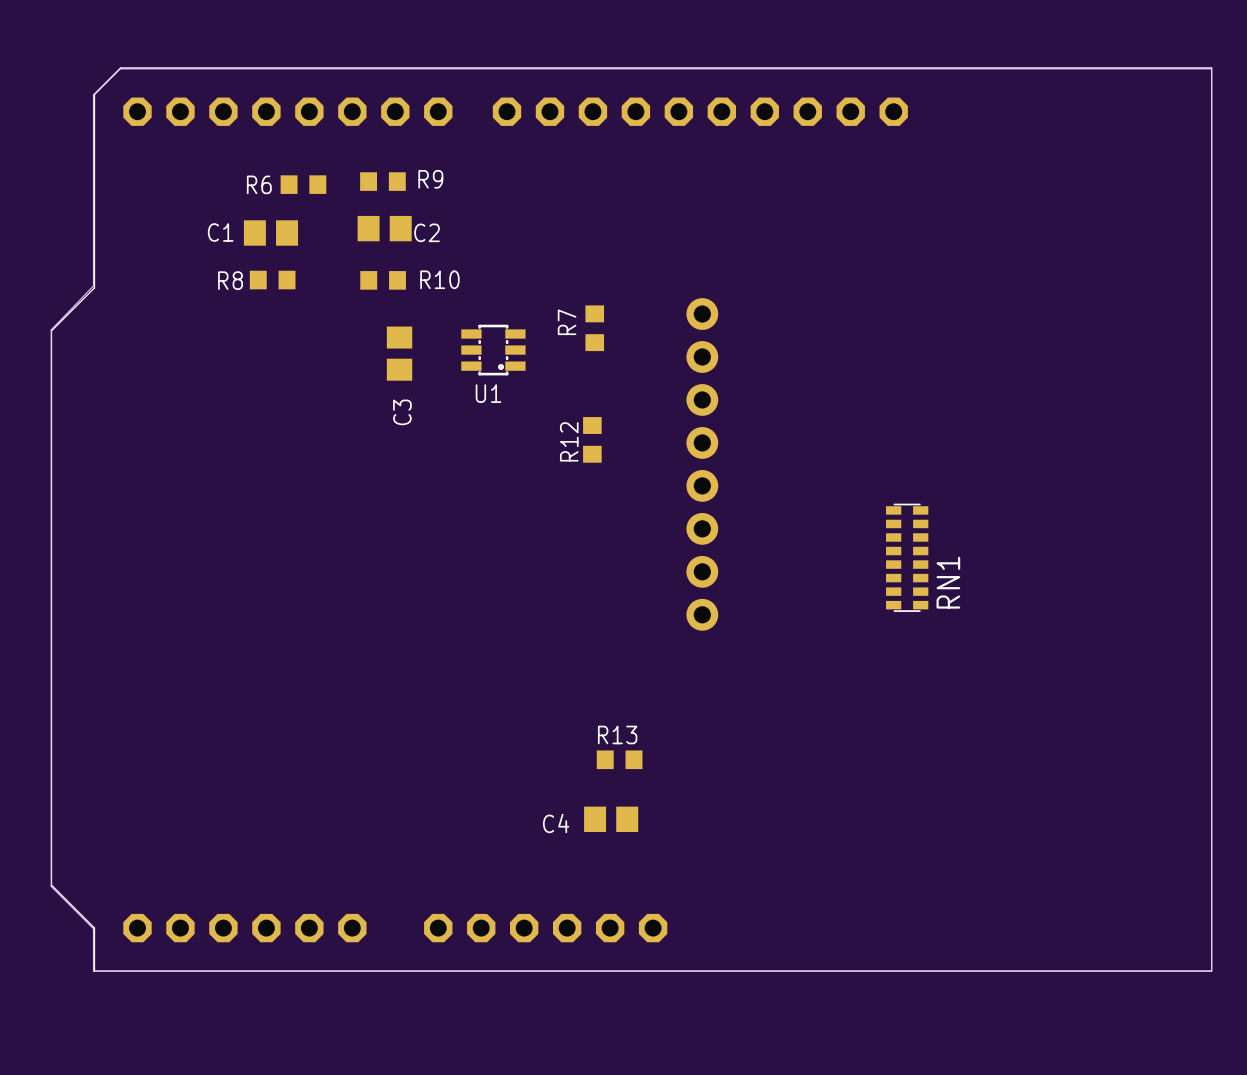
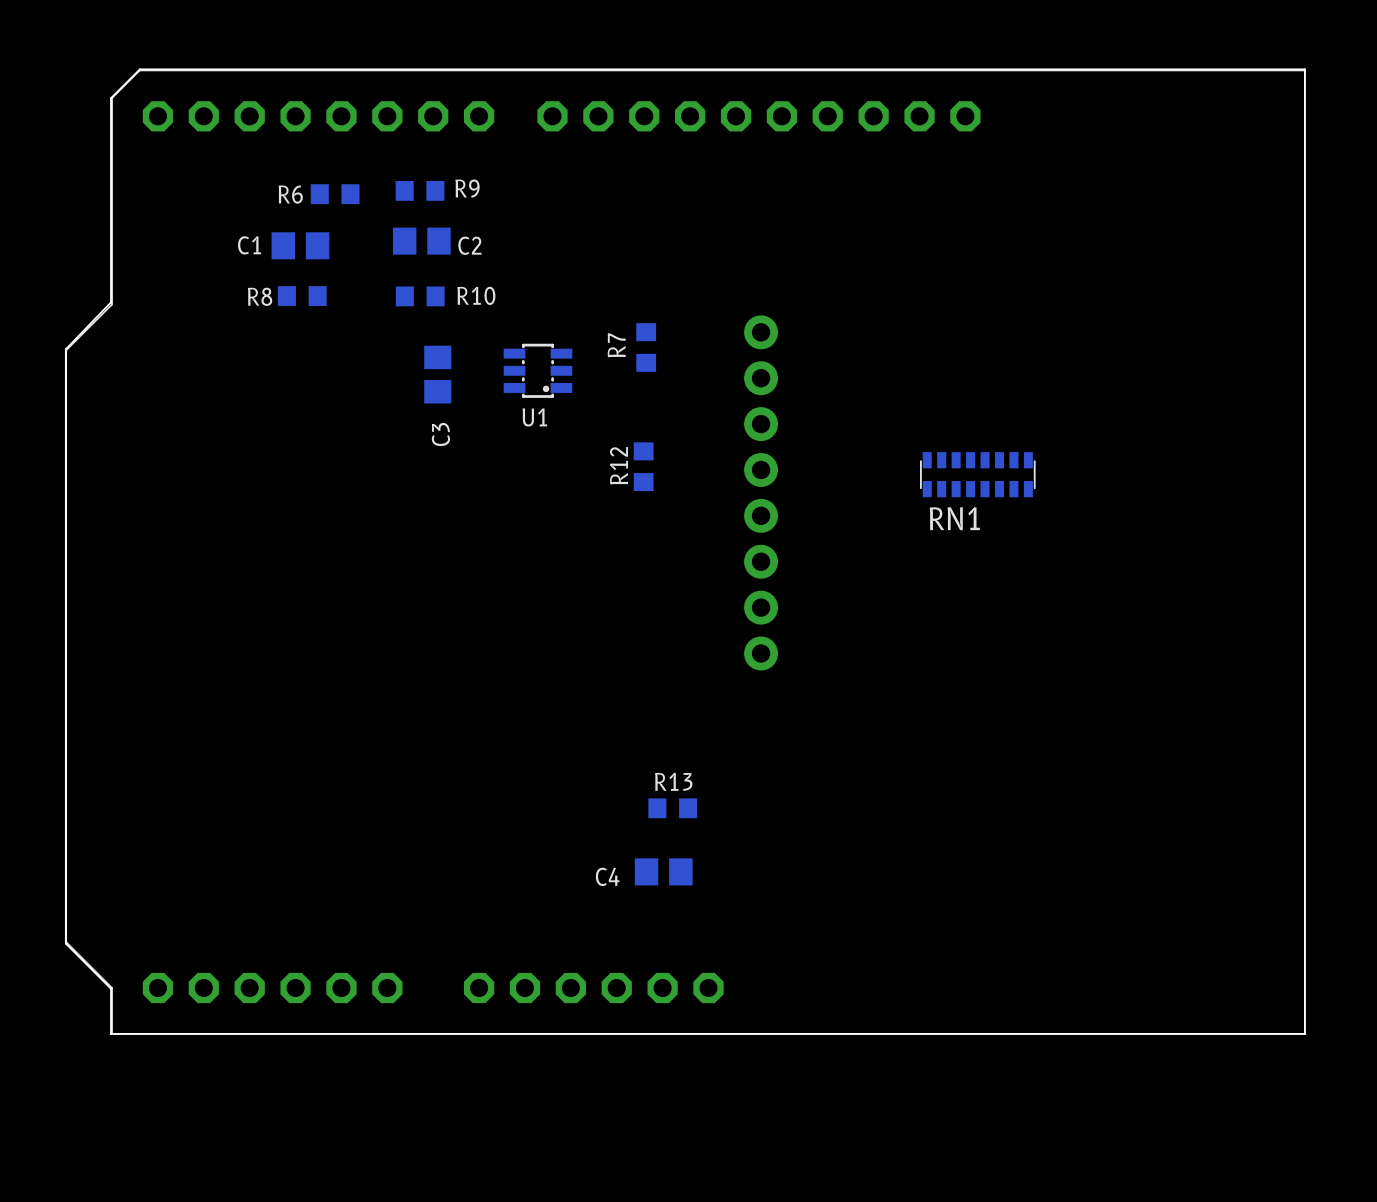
RN1 rotation: 0° (907, 557) -> 90° clockwise (977, 474)
RN1 position: (907, 557) -> (977, 474)

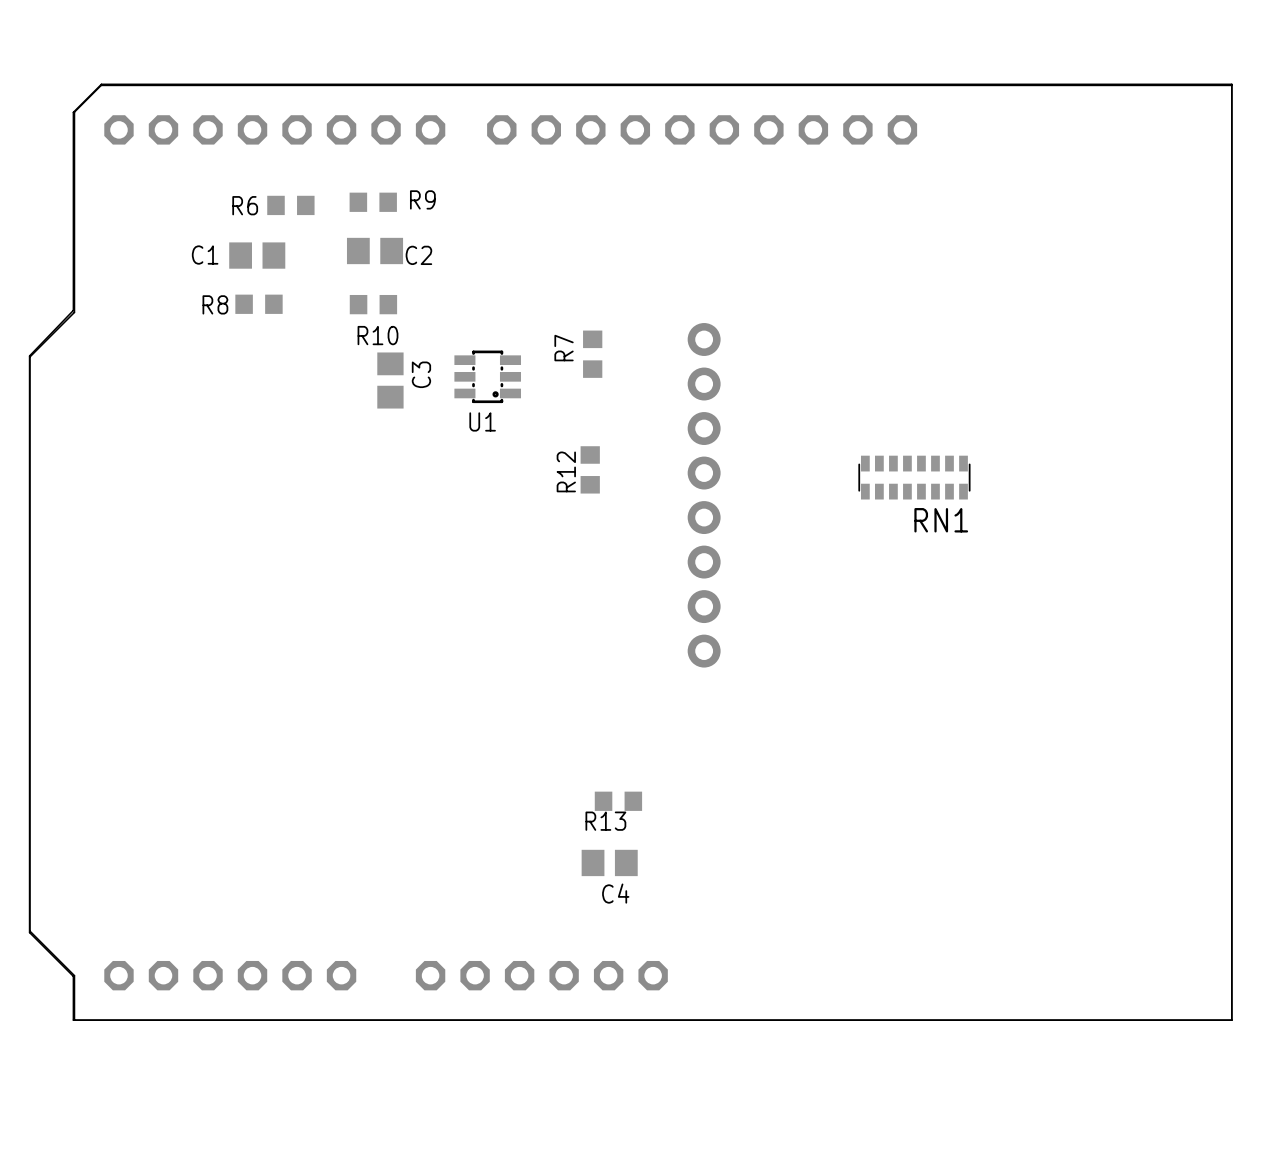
R10 name position: R10 (476, 295) -> R10 (377, 335)
C3 name position: C3 (440, 434) -> C3 (421, 374)
RN1 name position: RN1 (954, 518) -> RN1 (941, 520)
R13 name position: R13 (673, 781) -> R13 (605, 821)
C4 name position: C4 (607, 876) -> C4 (615, 893)

